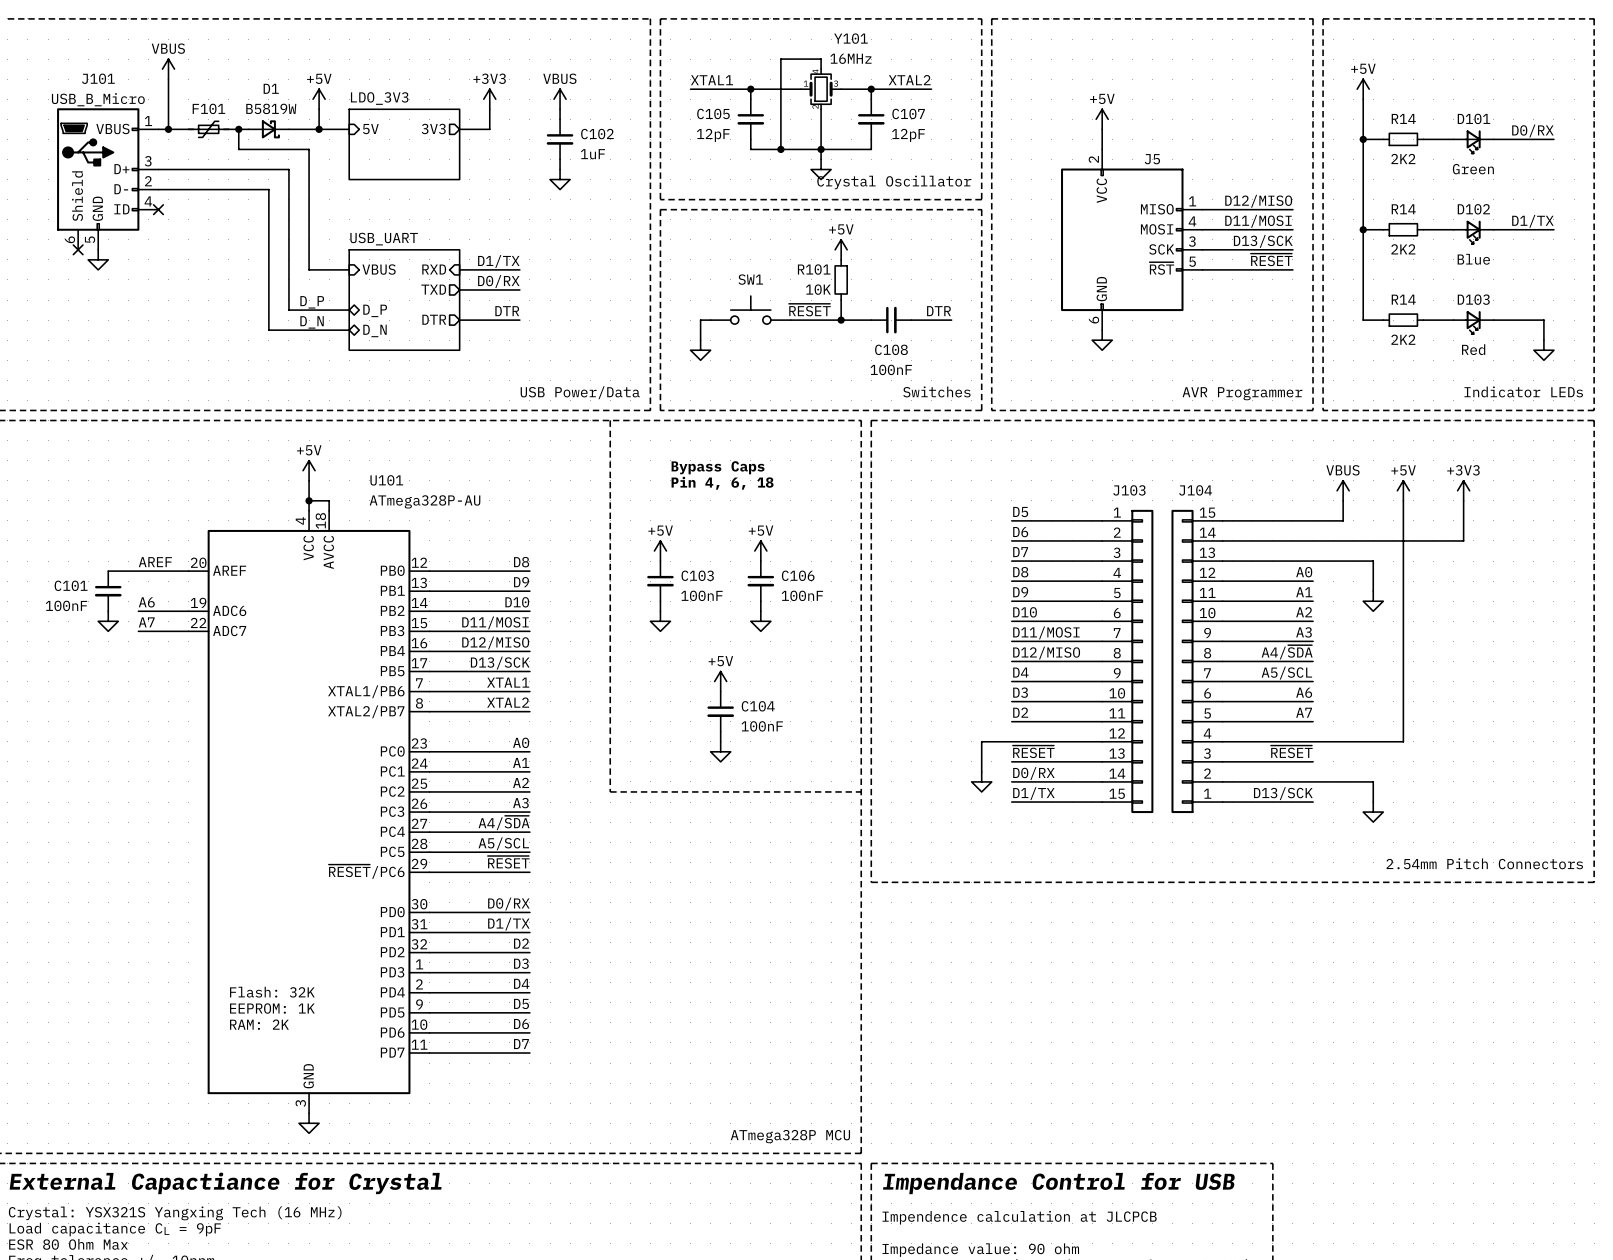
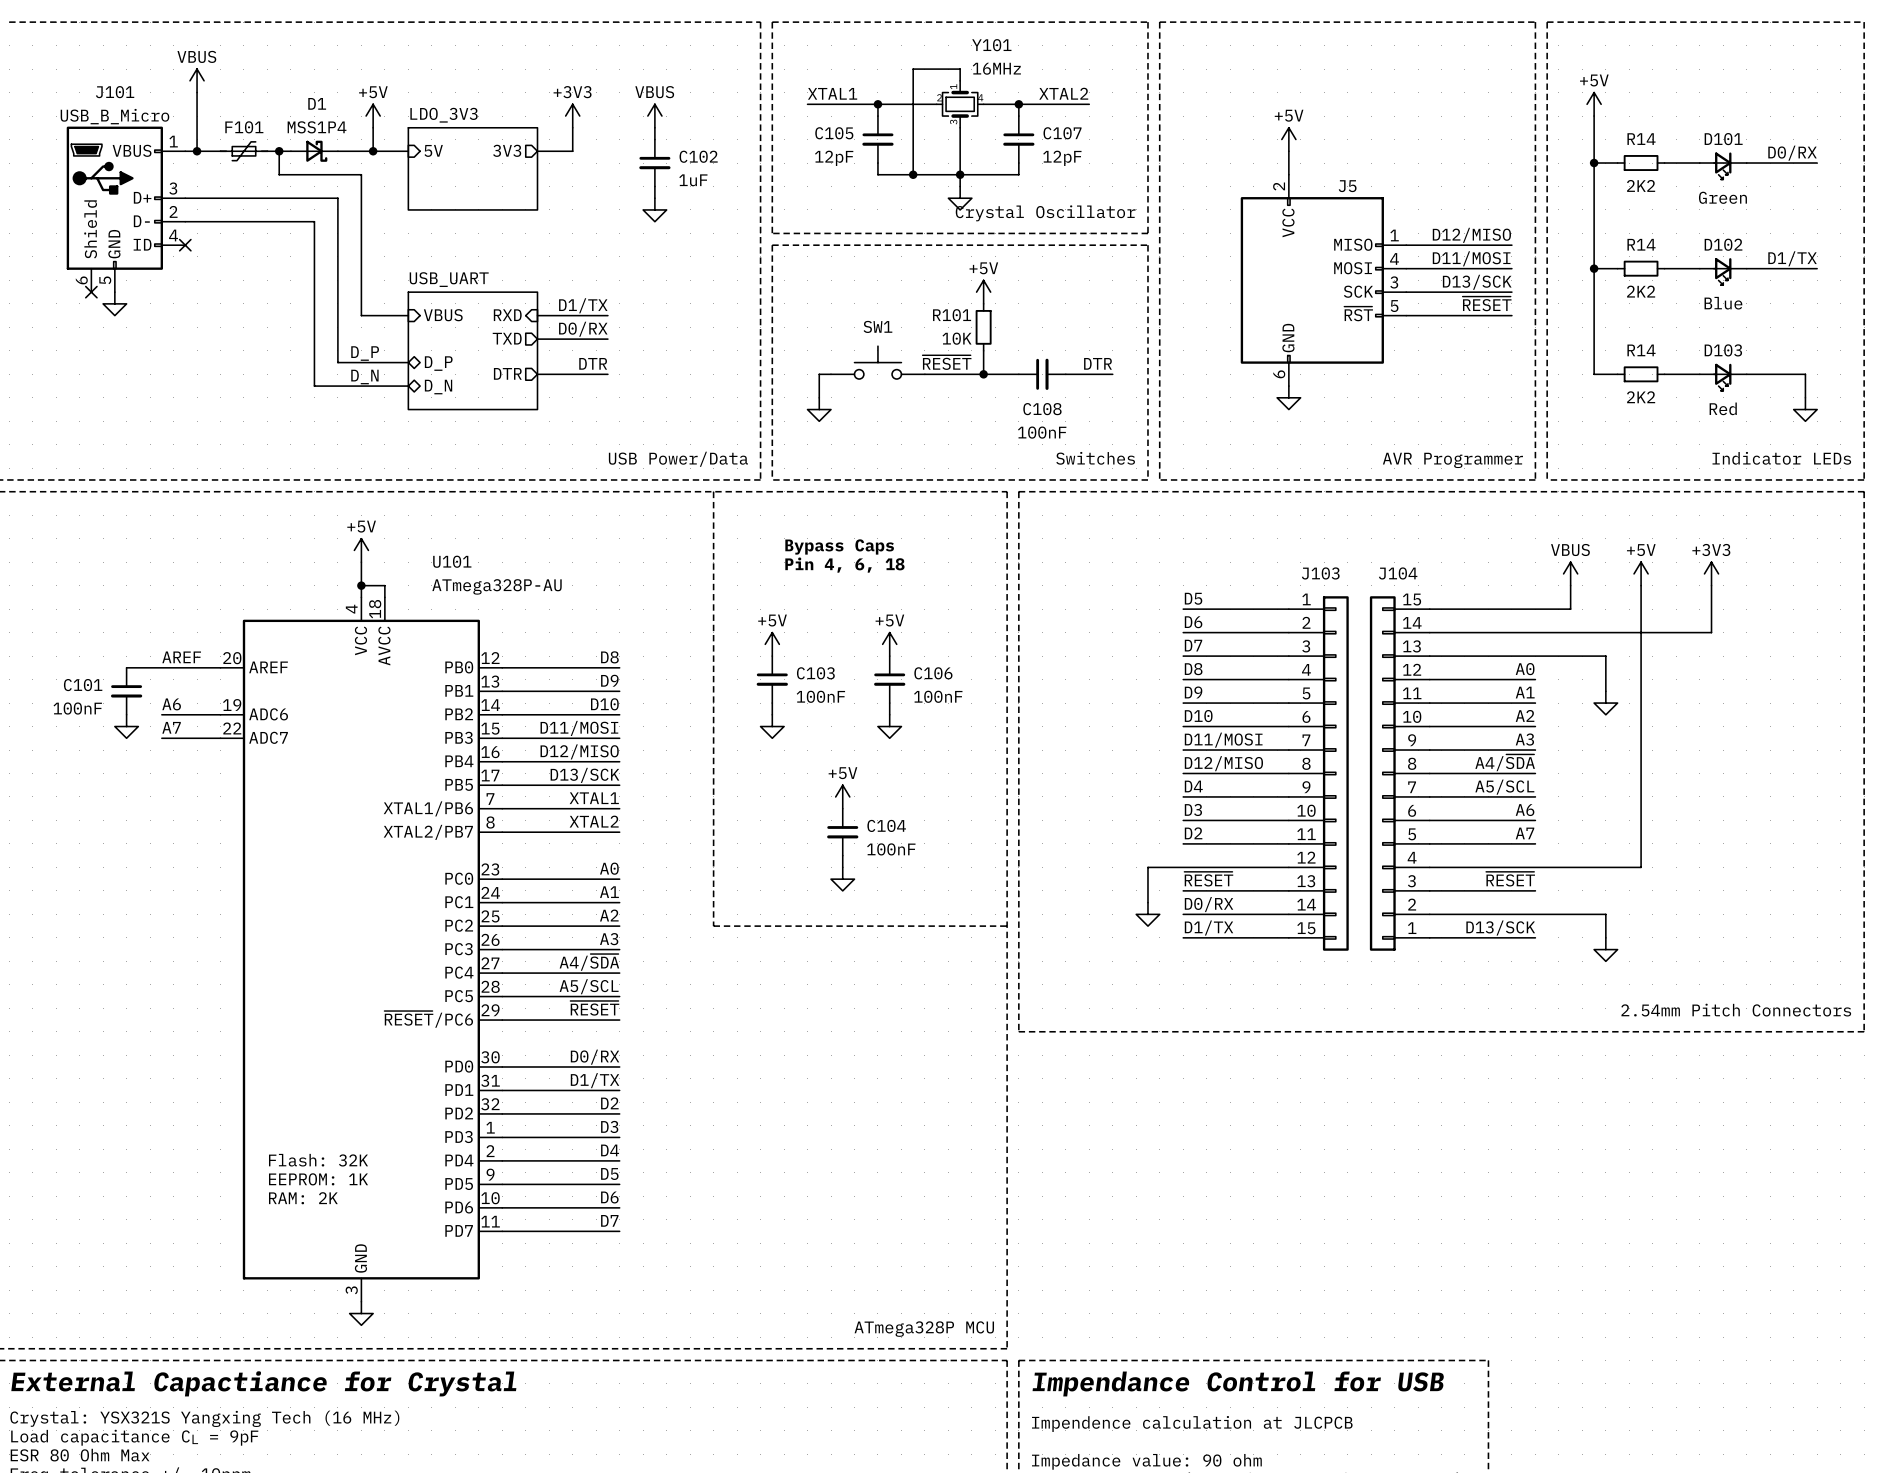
Y101 rotation: 0° (821, 89) -> 90° clockwise (960, 104)
D1 value: B5819W (271, 108) -> MSS1P4 (317, 127)

